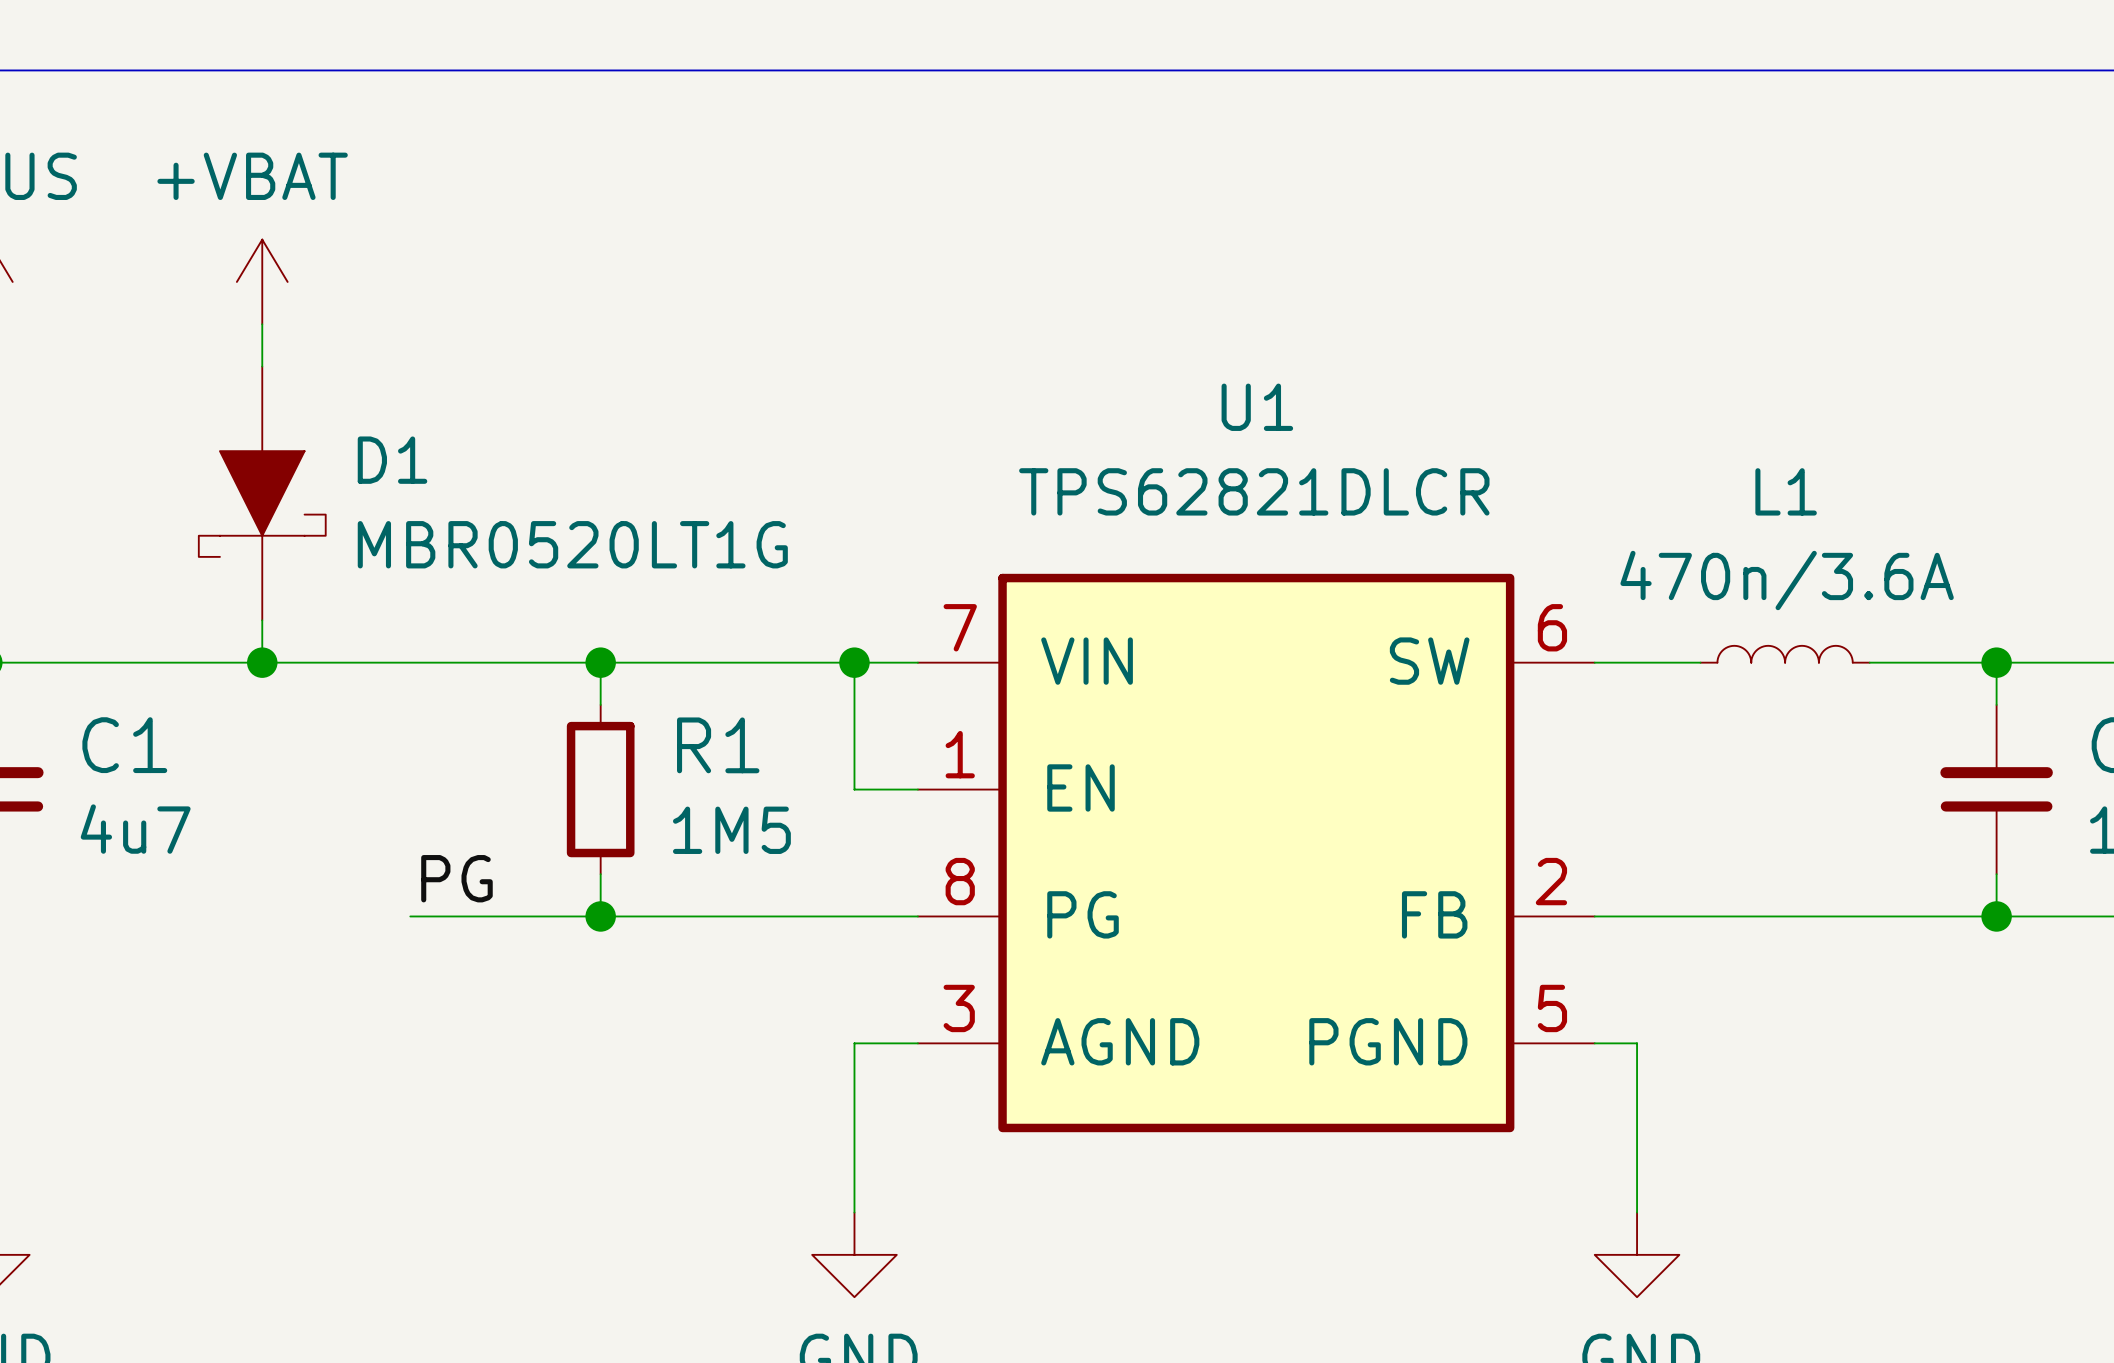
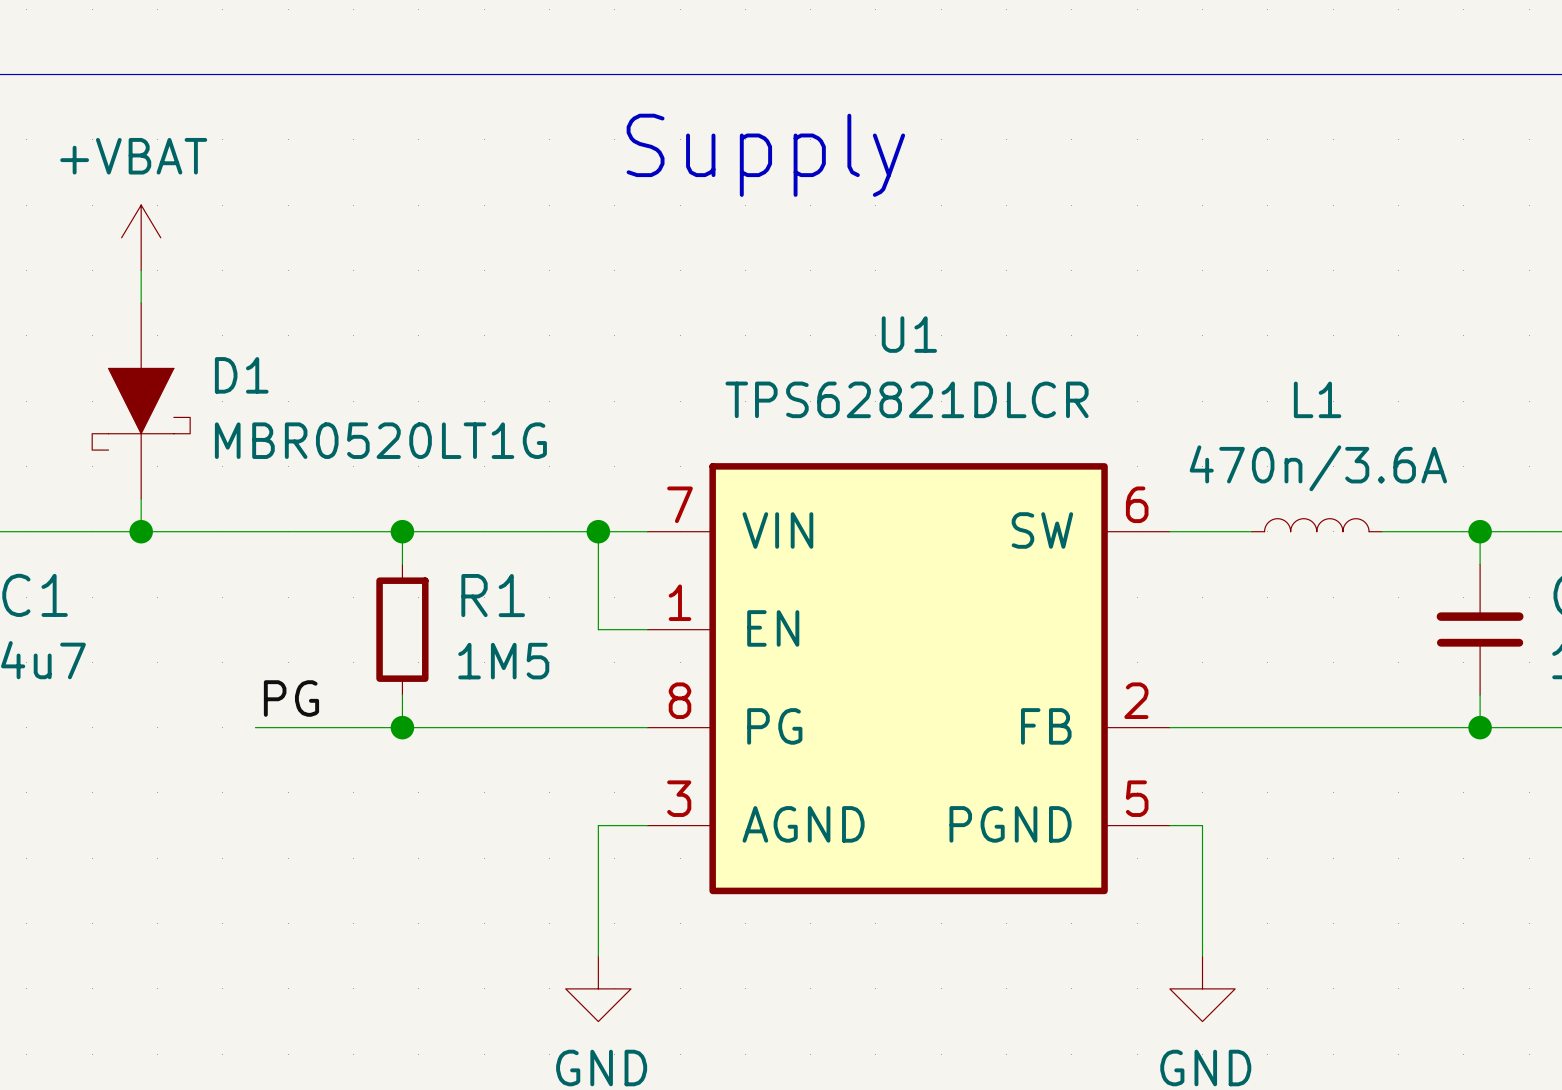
text: none -> Supply (765, 155)

